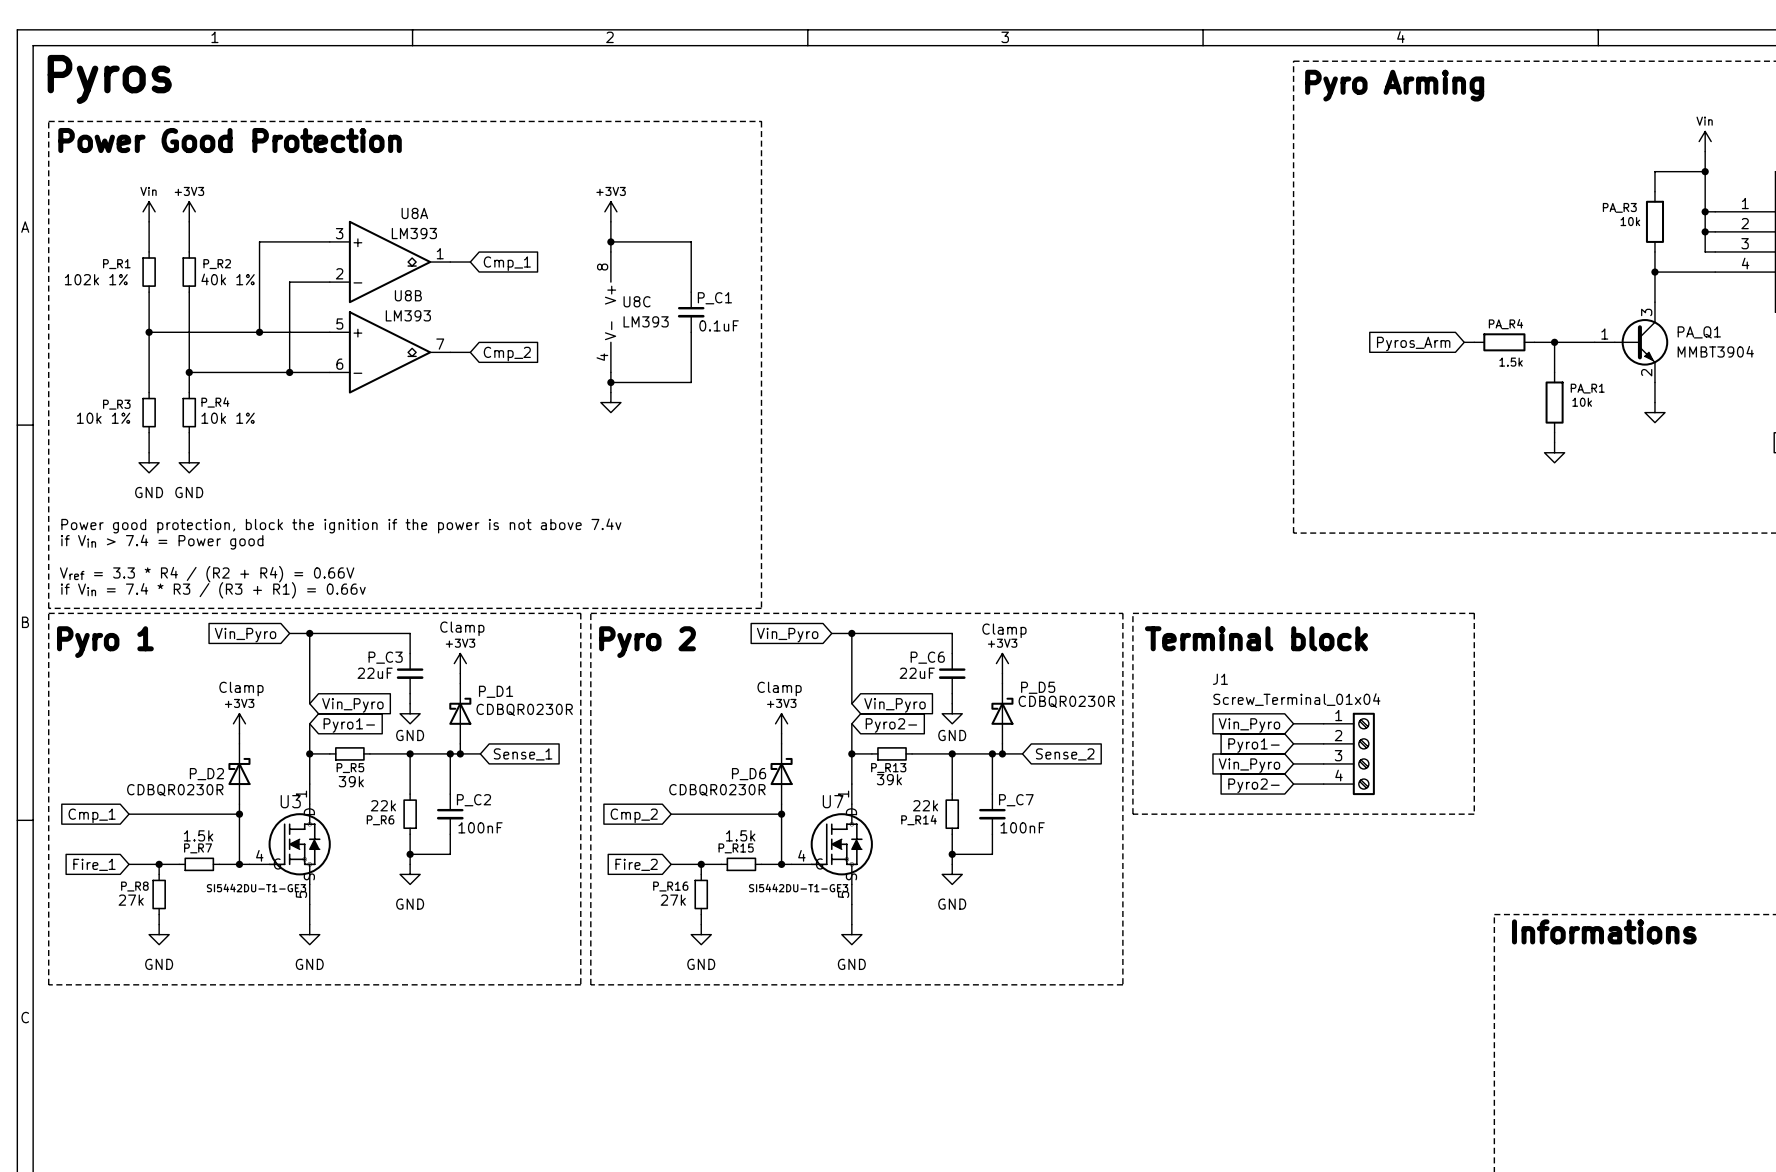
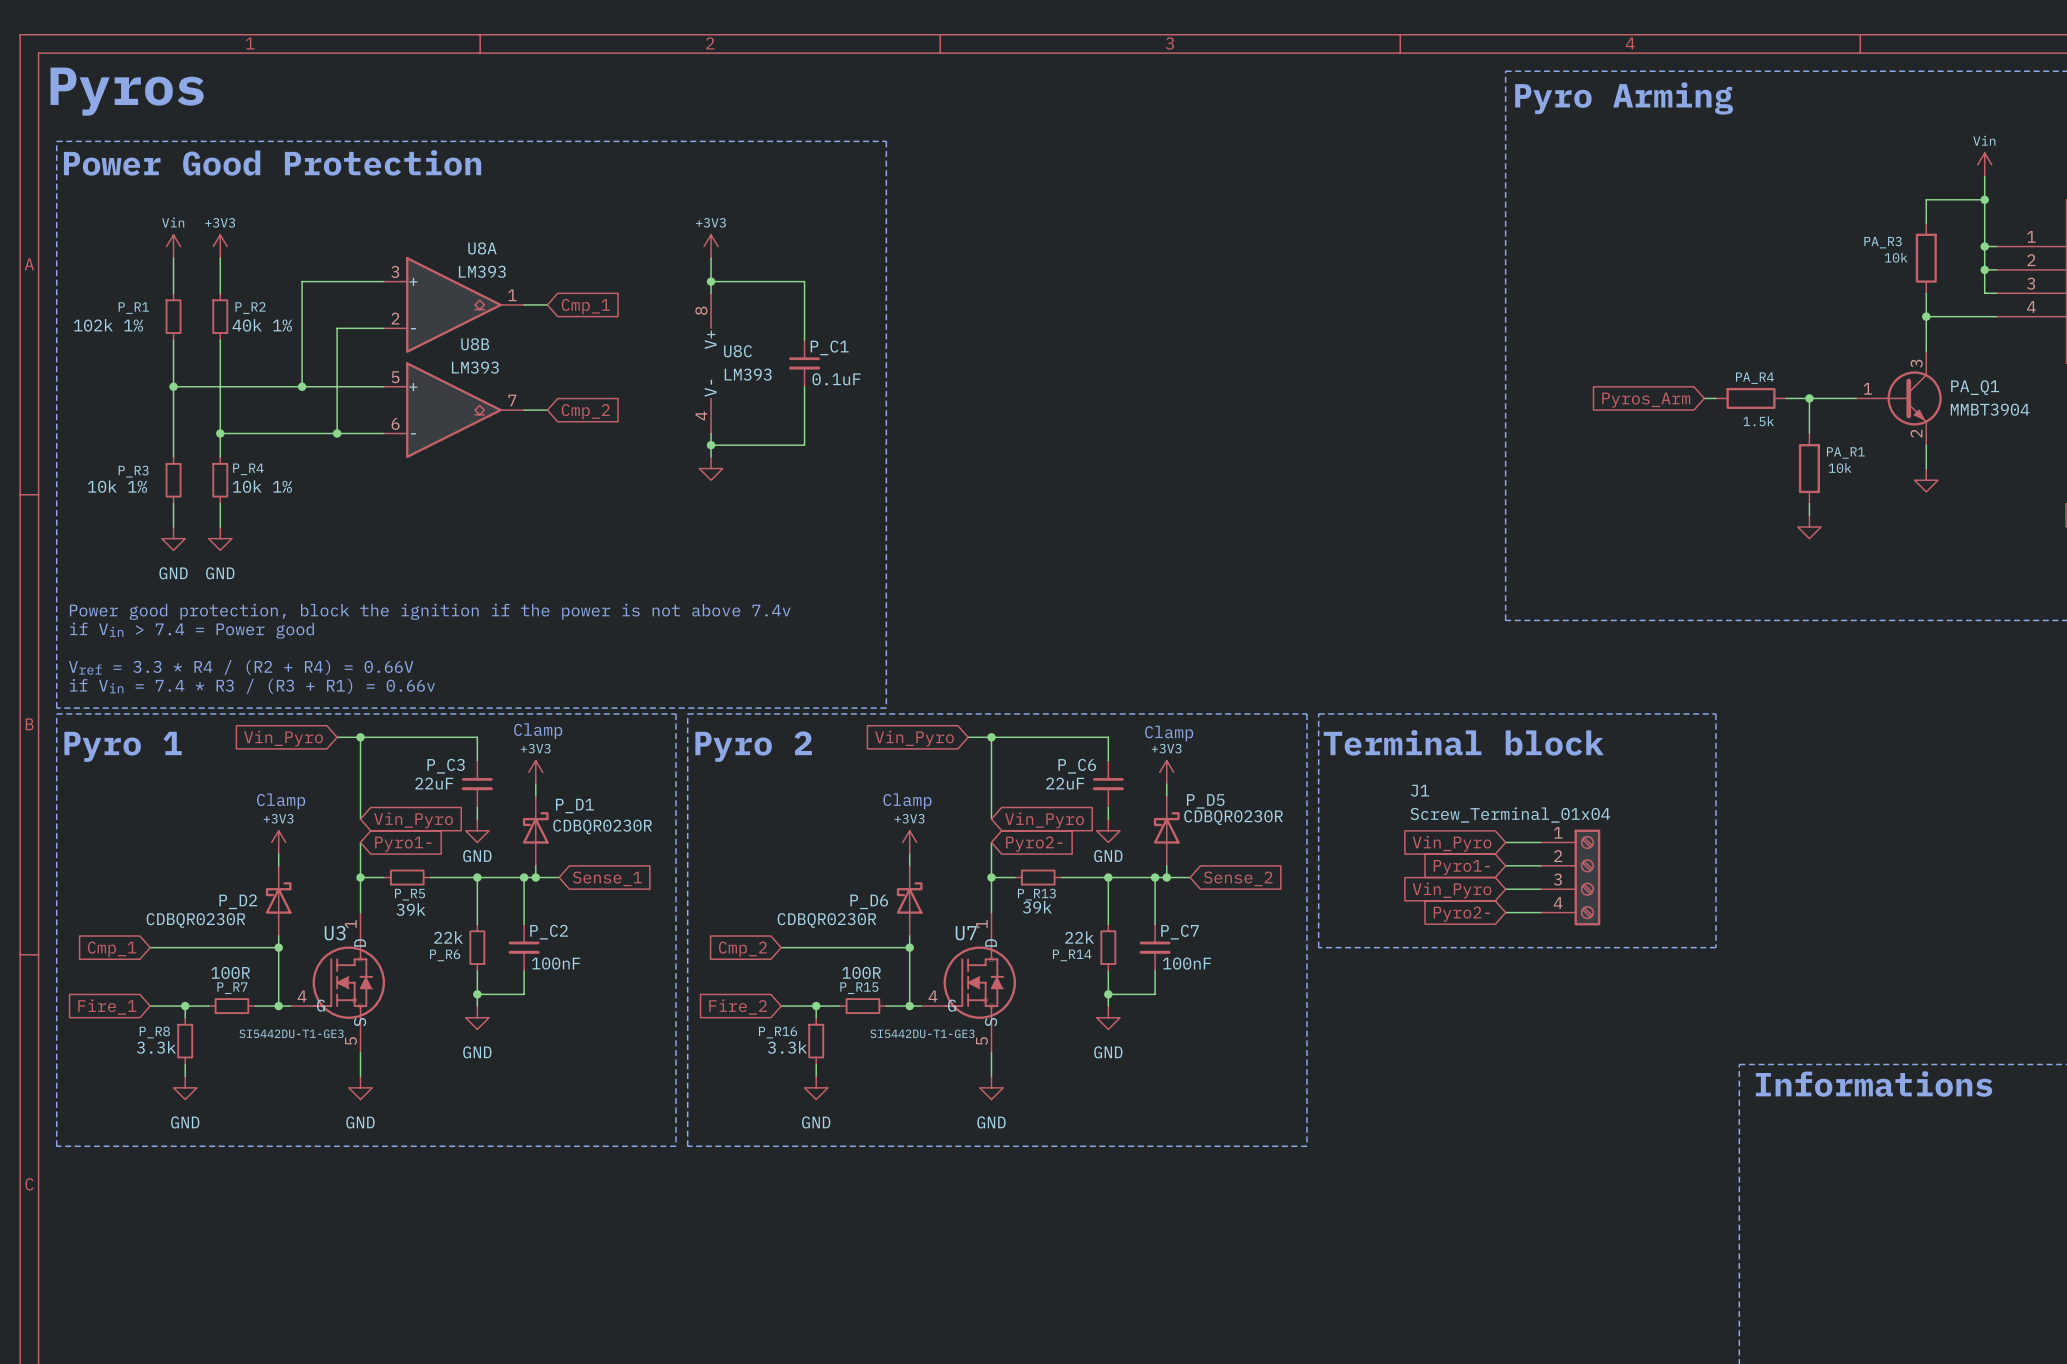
P_R7 value: 1.5k (198, 835) -> 100R (230, 972)
P_R15 value: 1.5k (740, 835) -> 100R (861, 972)
P_R8 value: 27k (131, 900) -> 3.3k (156, 1047)
P_R16 value: 27k (673, 900) -> 3.3k (787, 1047)

